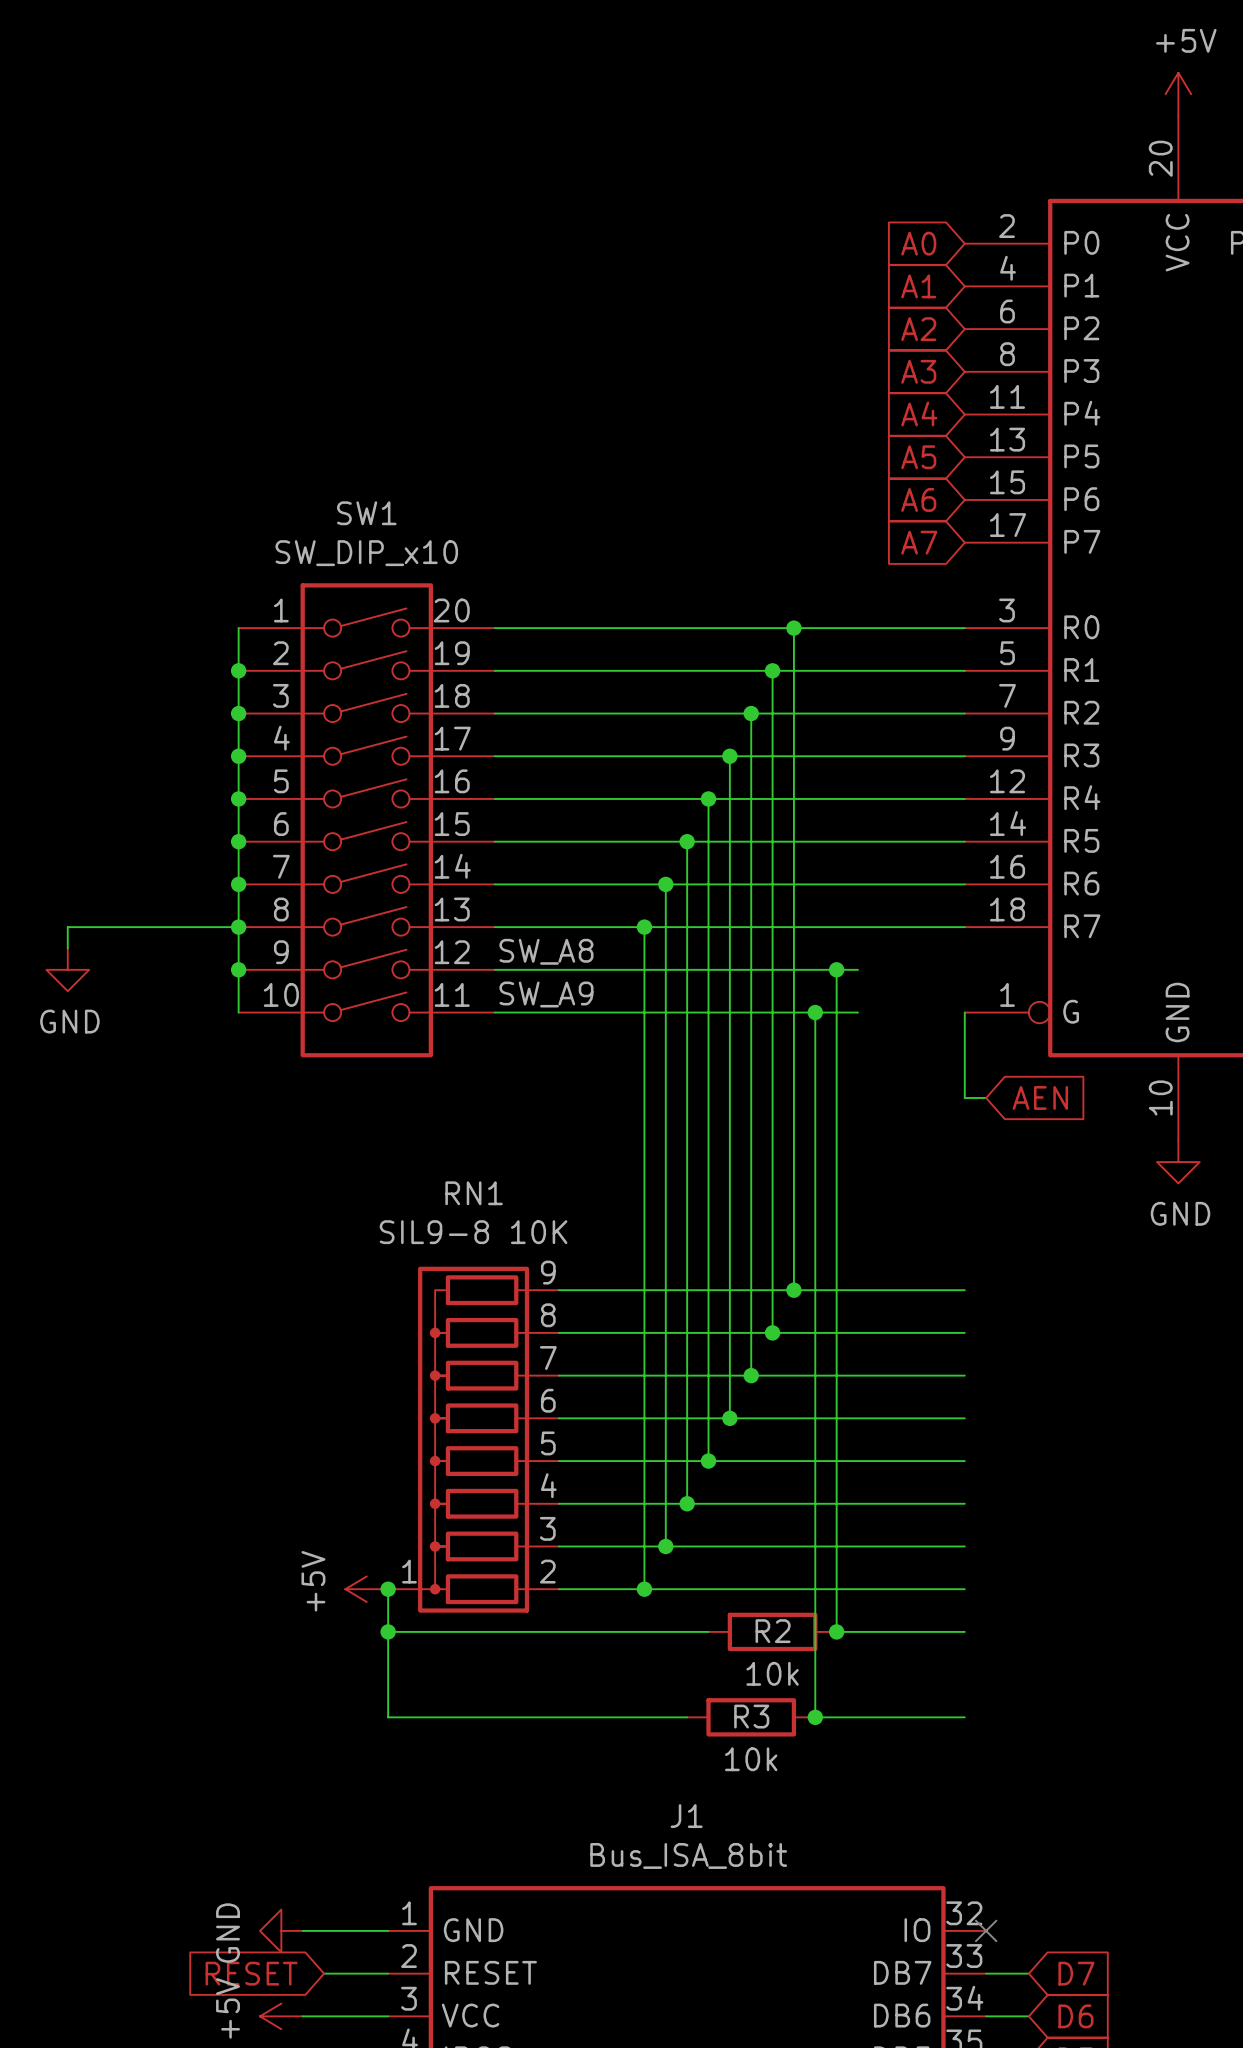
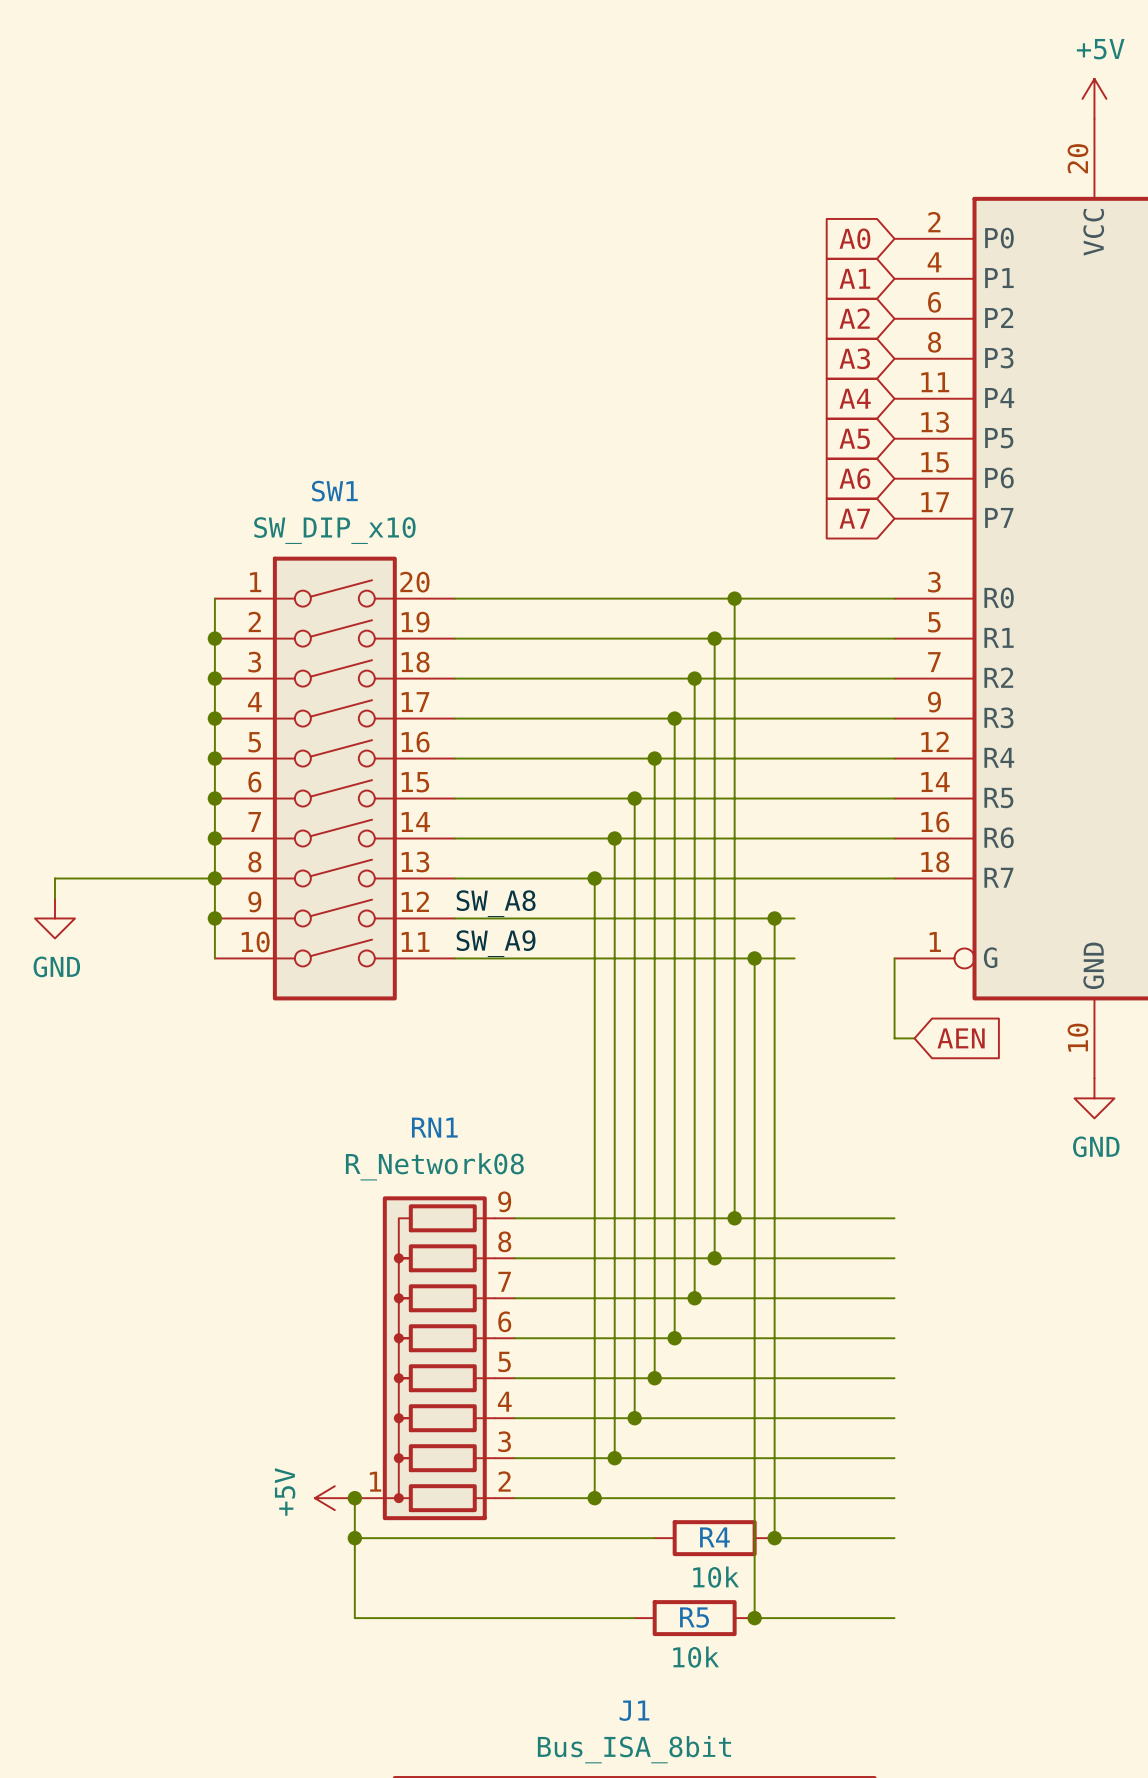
RN1 value: SIL9-8 10K (473, 1232) -> R_Network08 (434, 1166)
R2 name: R2 (773, 1631) -> R4 (714, 1537)
R3 name: R3 (751, 1716) -> R5 (694, 1617)

